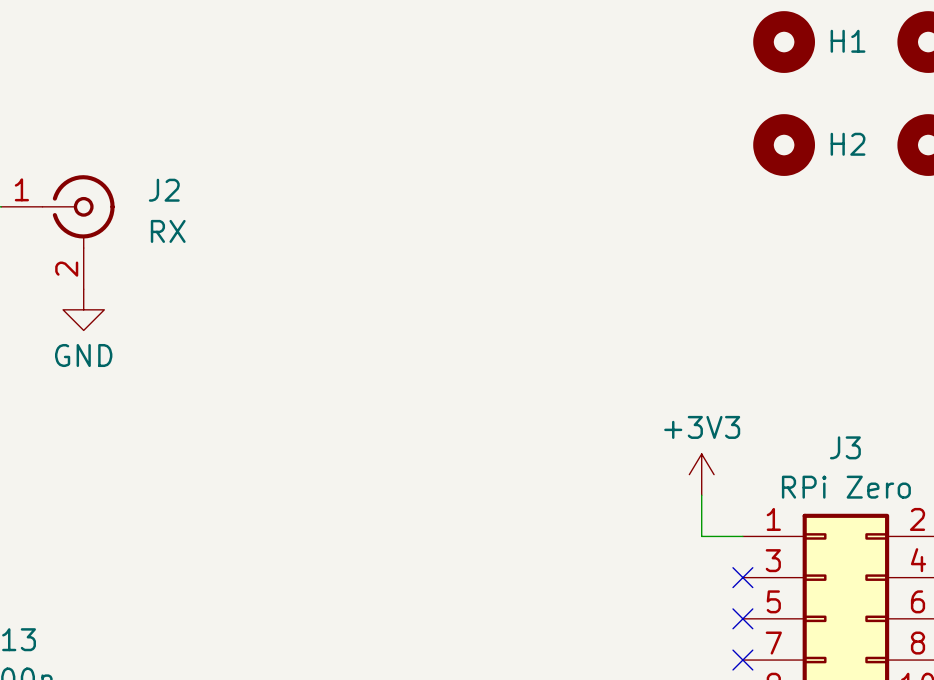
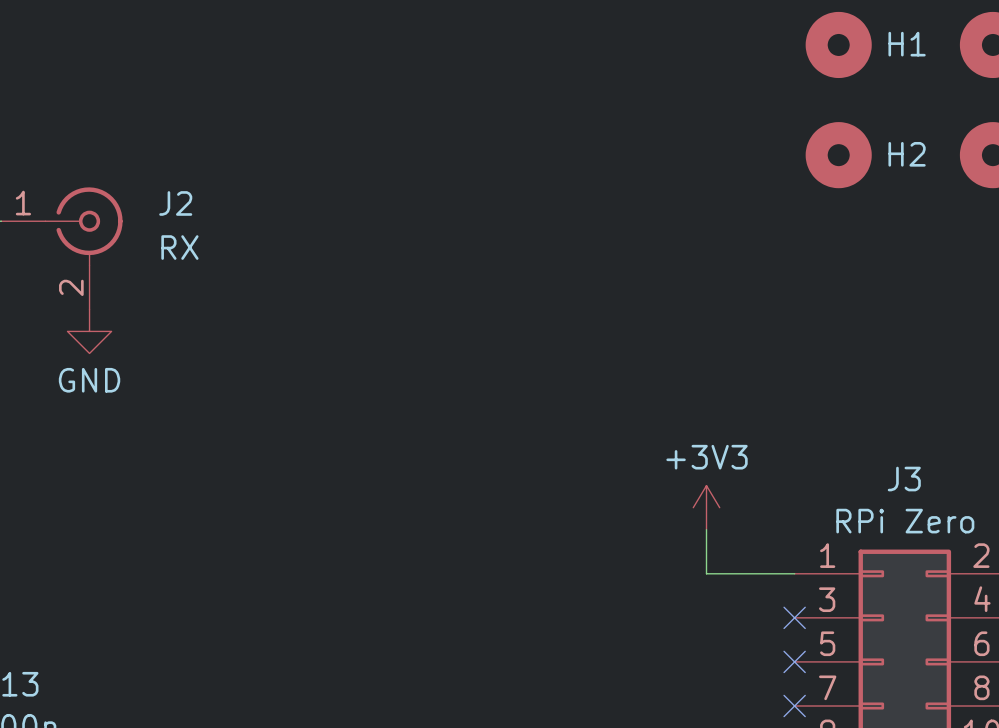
power symbol position: +3V3 (701, 474) -> +3V3 (706, 507)
wire: (701, 495) (701, 536) -> (706, 529) (706, 573) (750, 573)

